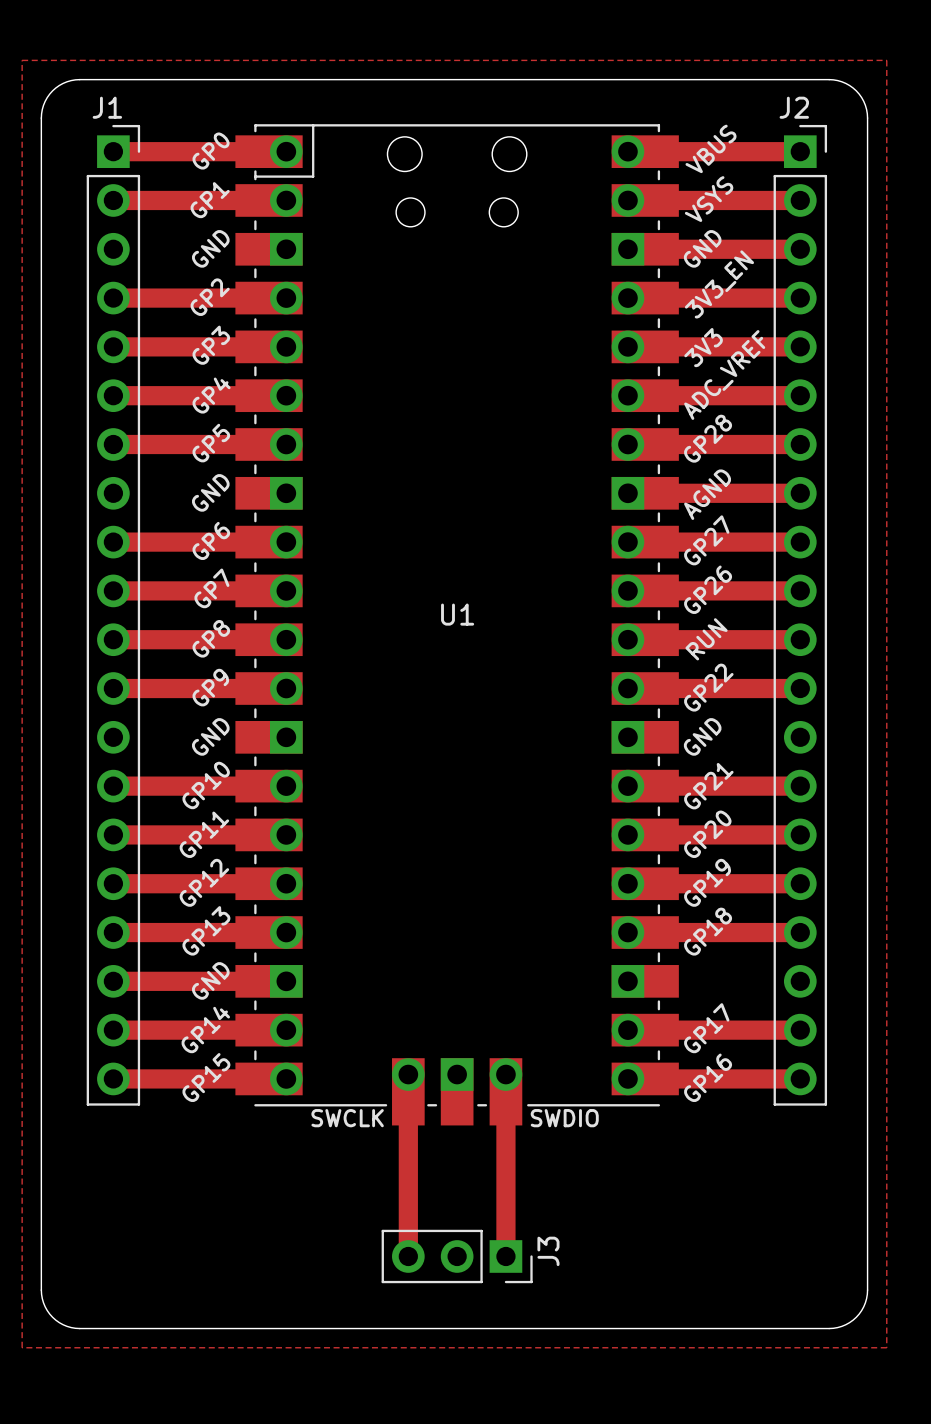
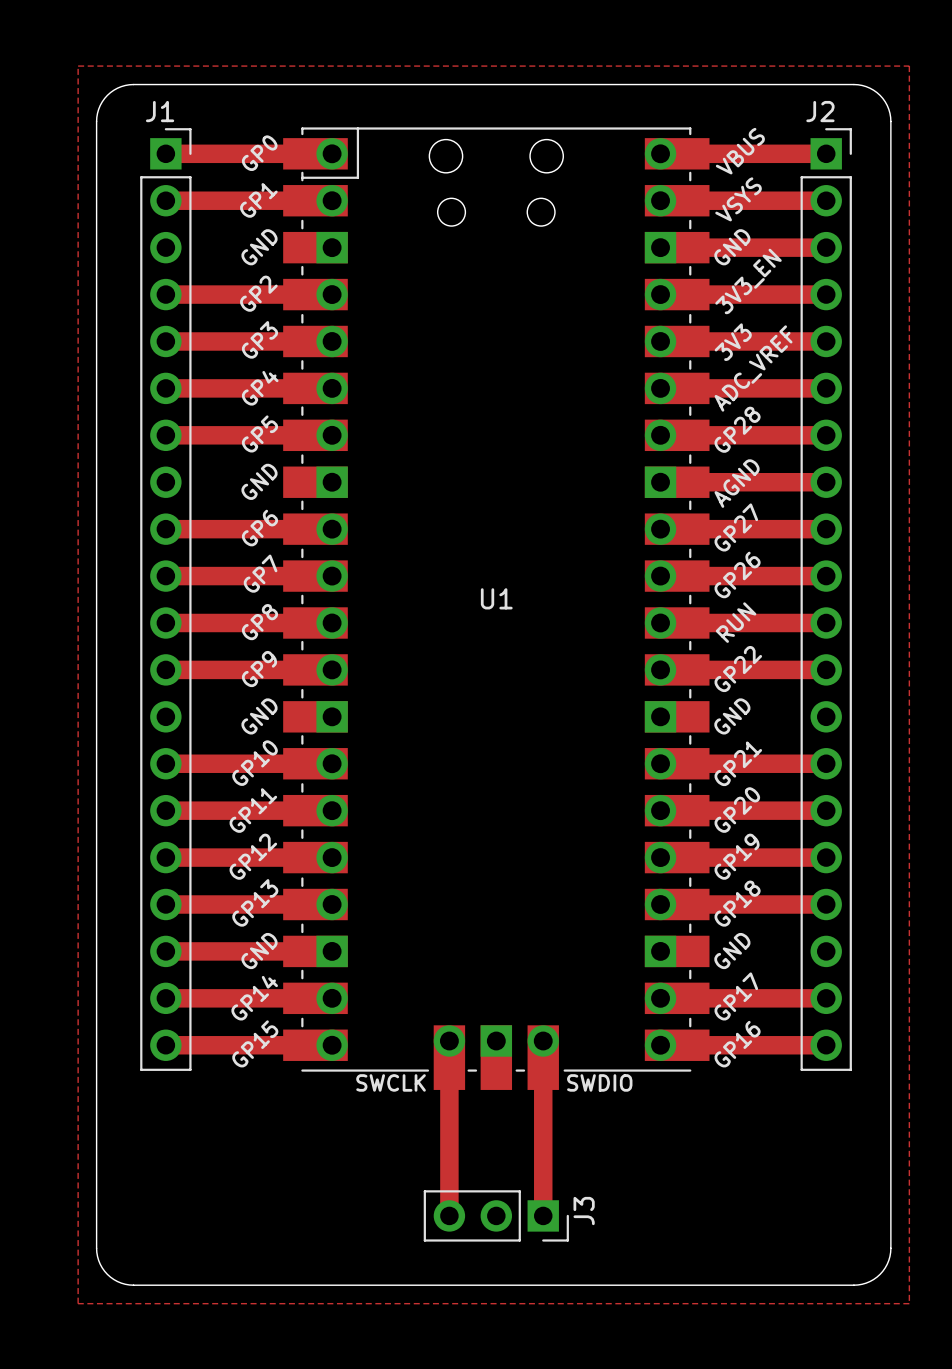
U1 text: none -> GND (732, 951)

